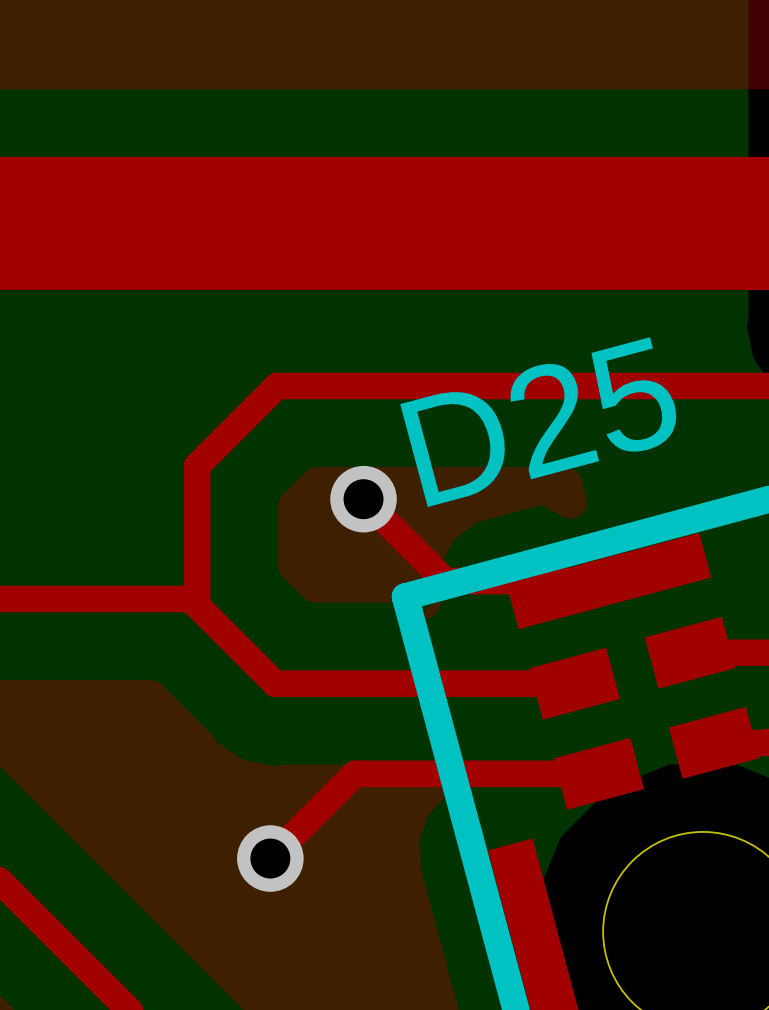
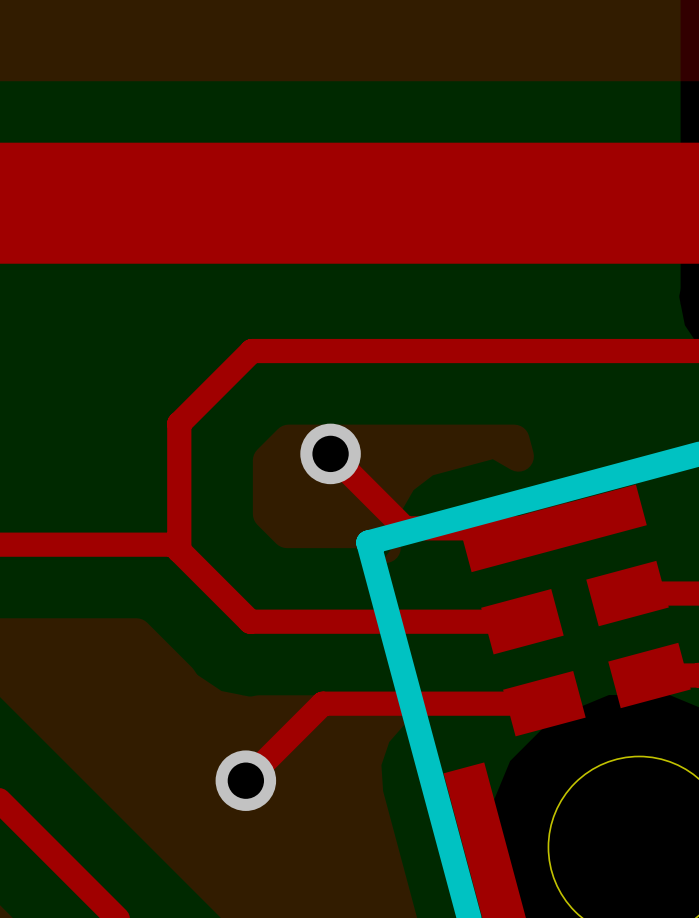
D25 name: D25 (539, 422) -> none

